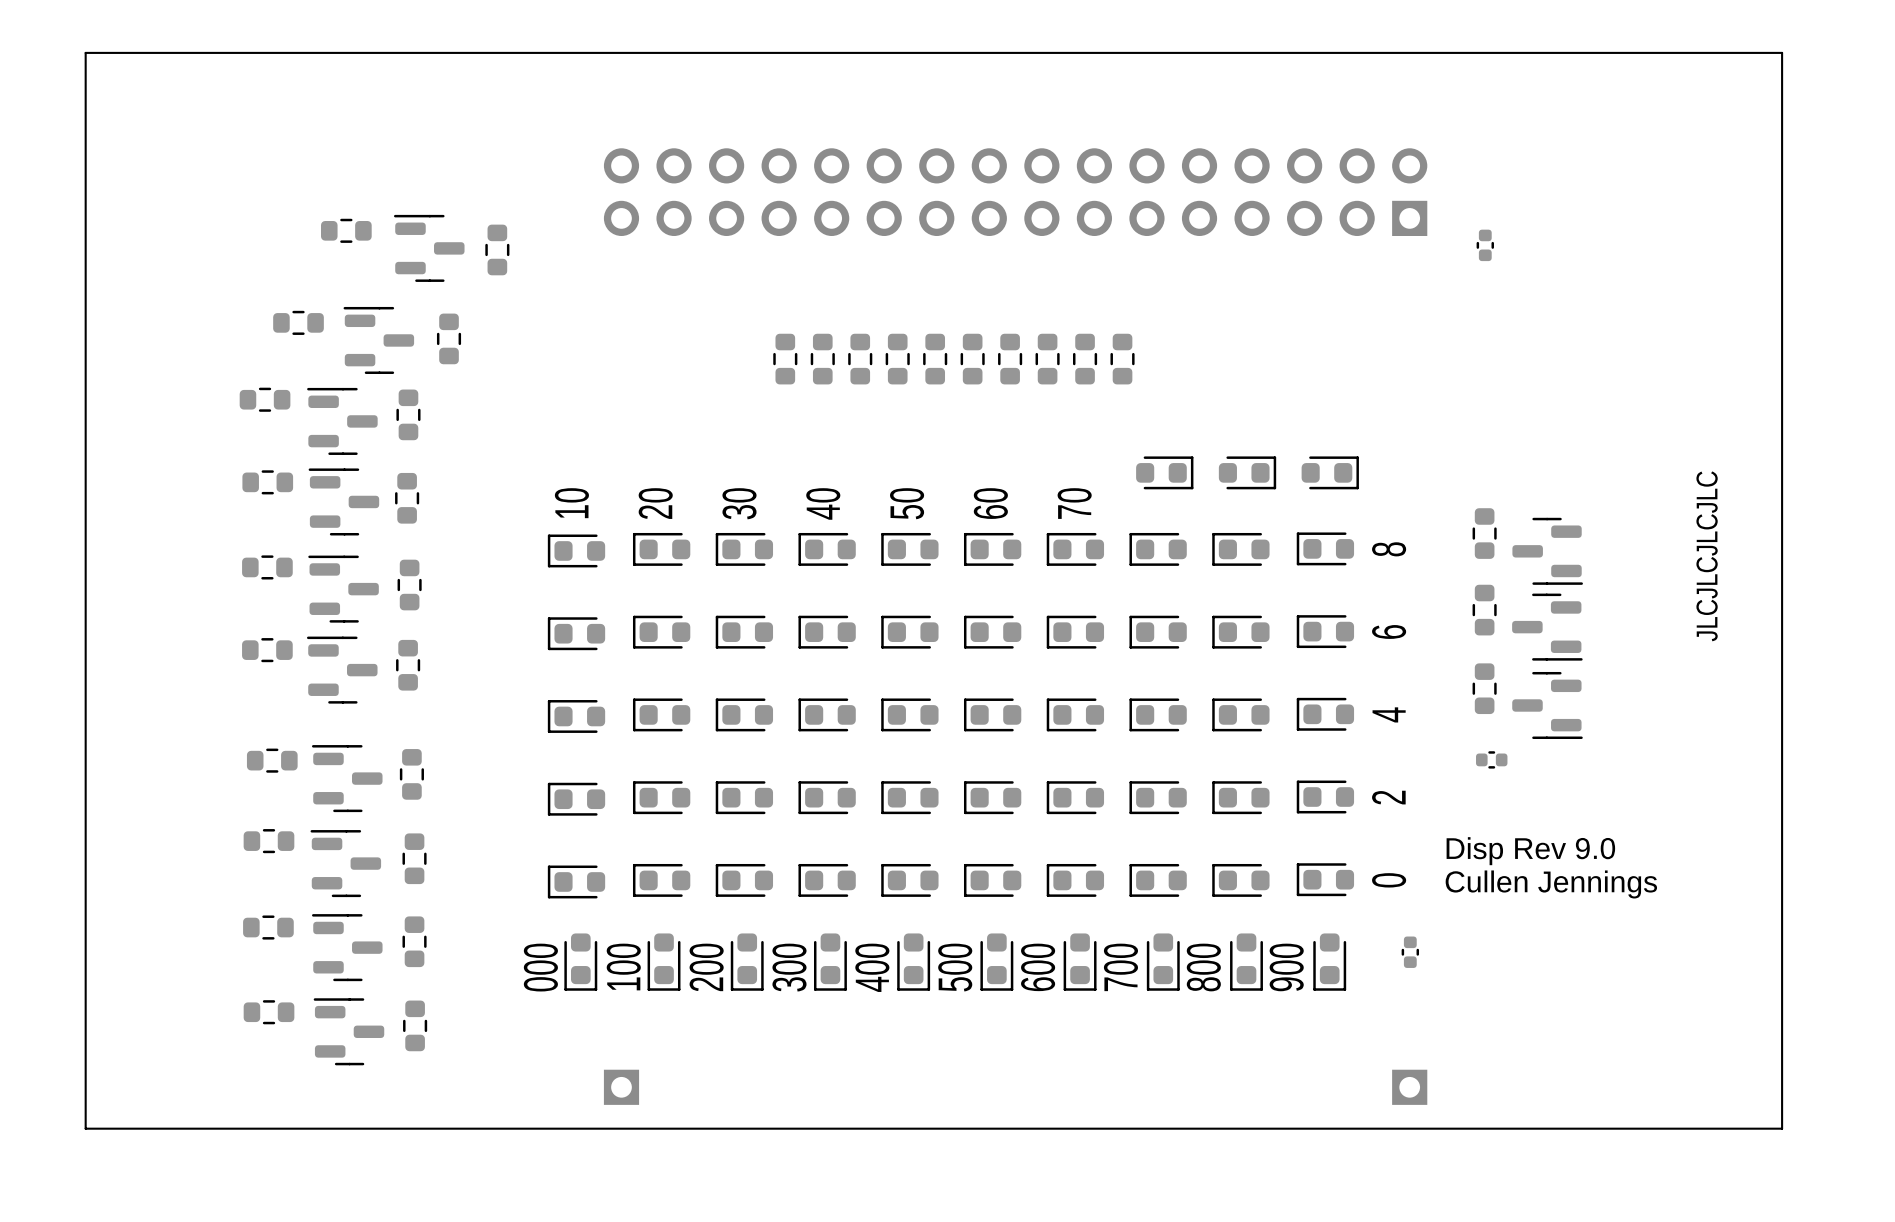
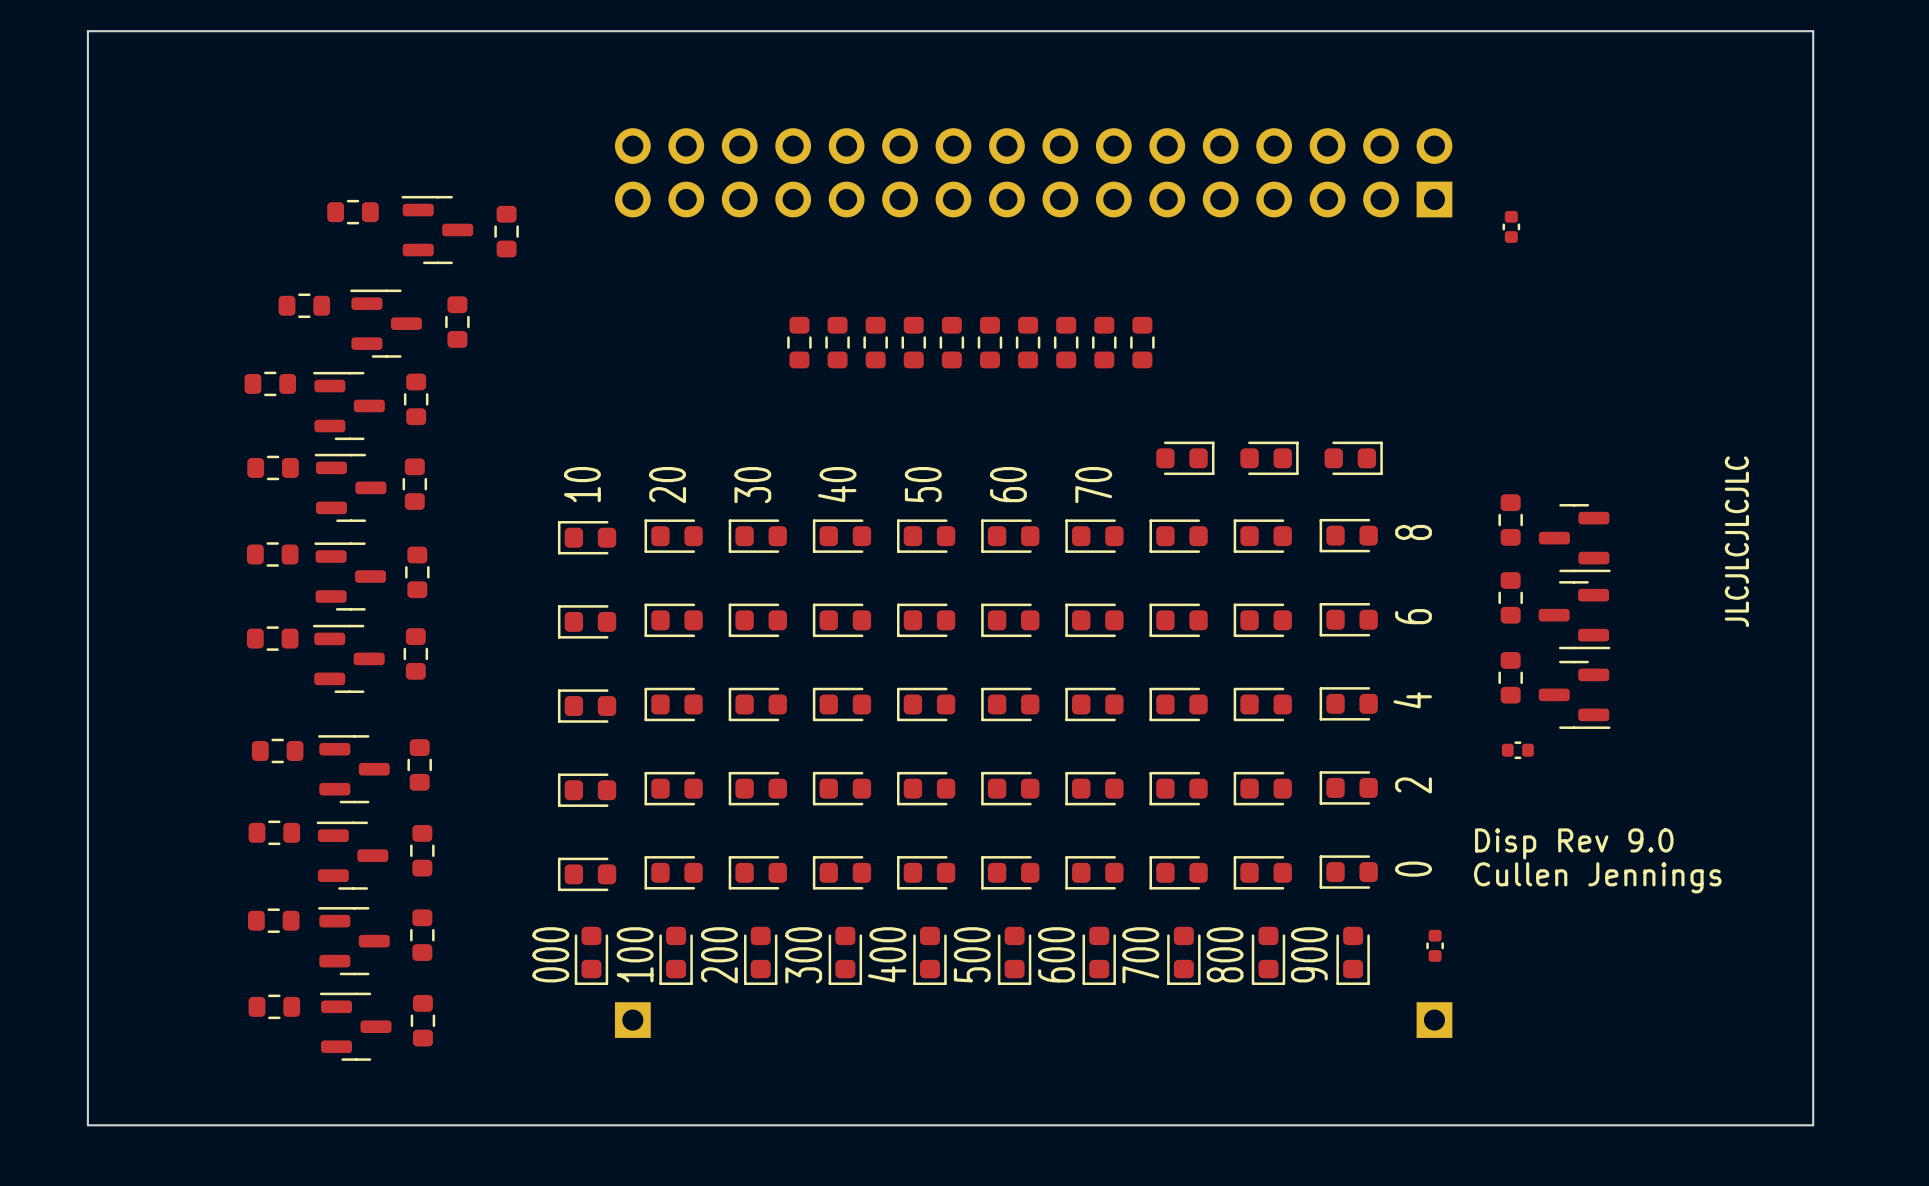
part position: (621, 1087) -> (632, 1020)
part position: (1409, 1087) -> (1434, 1020)

